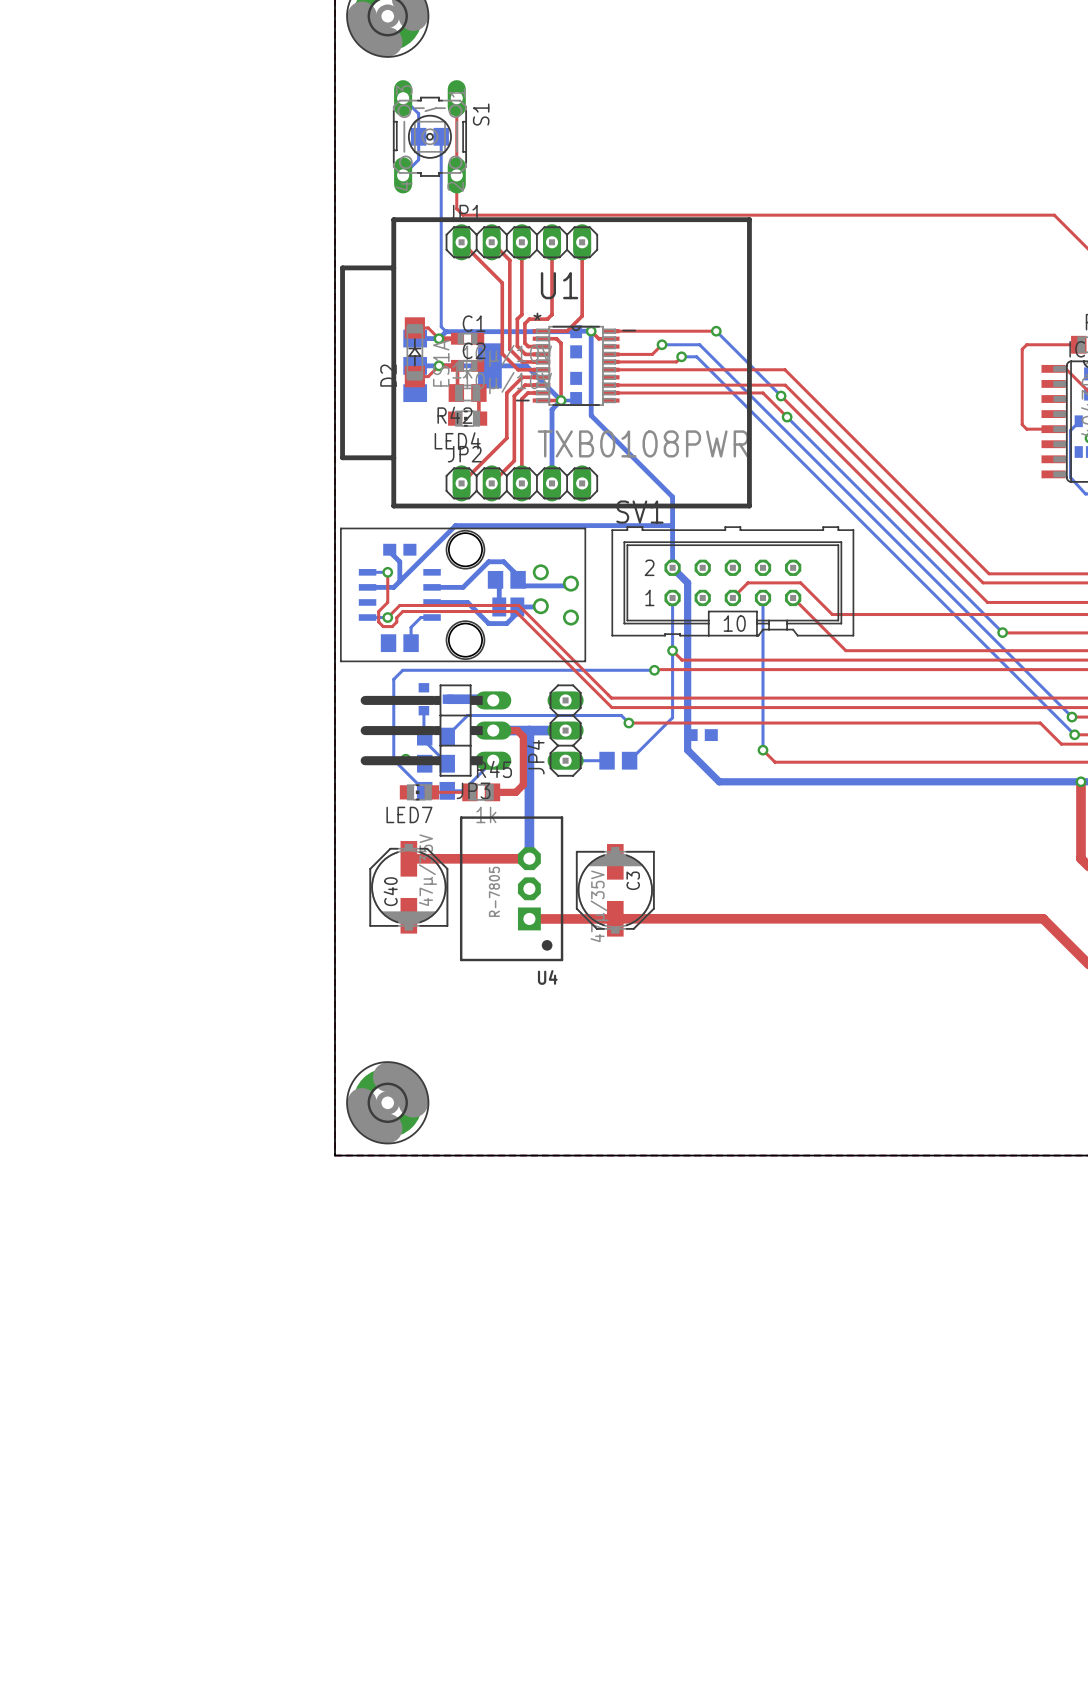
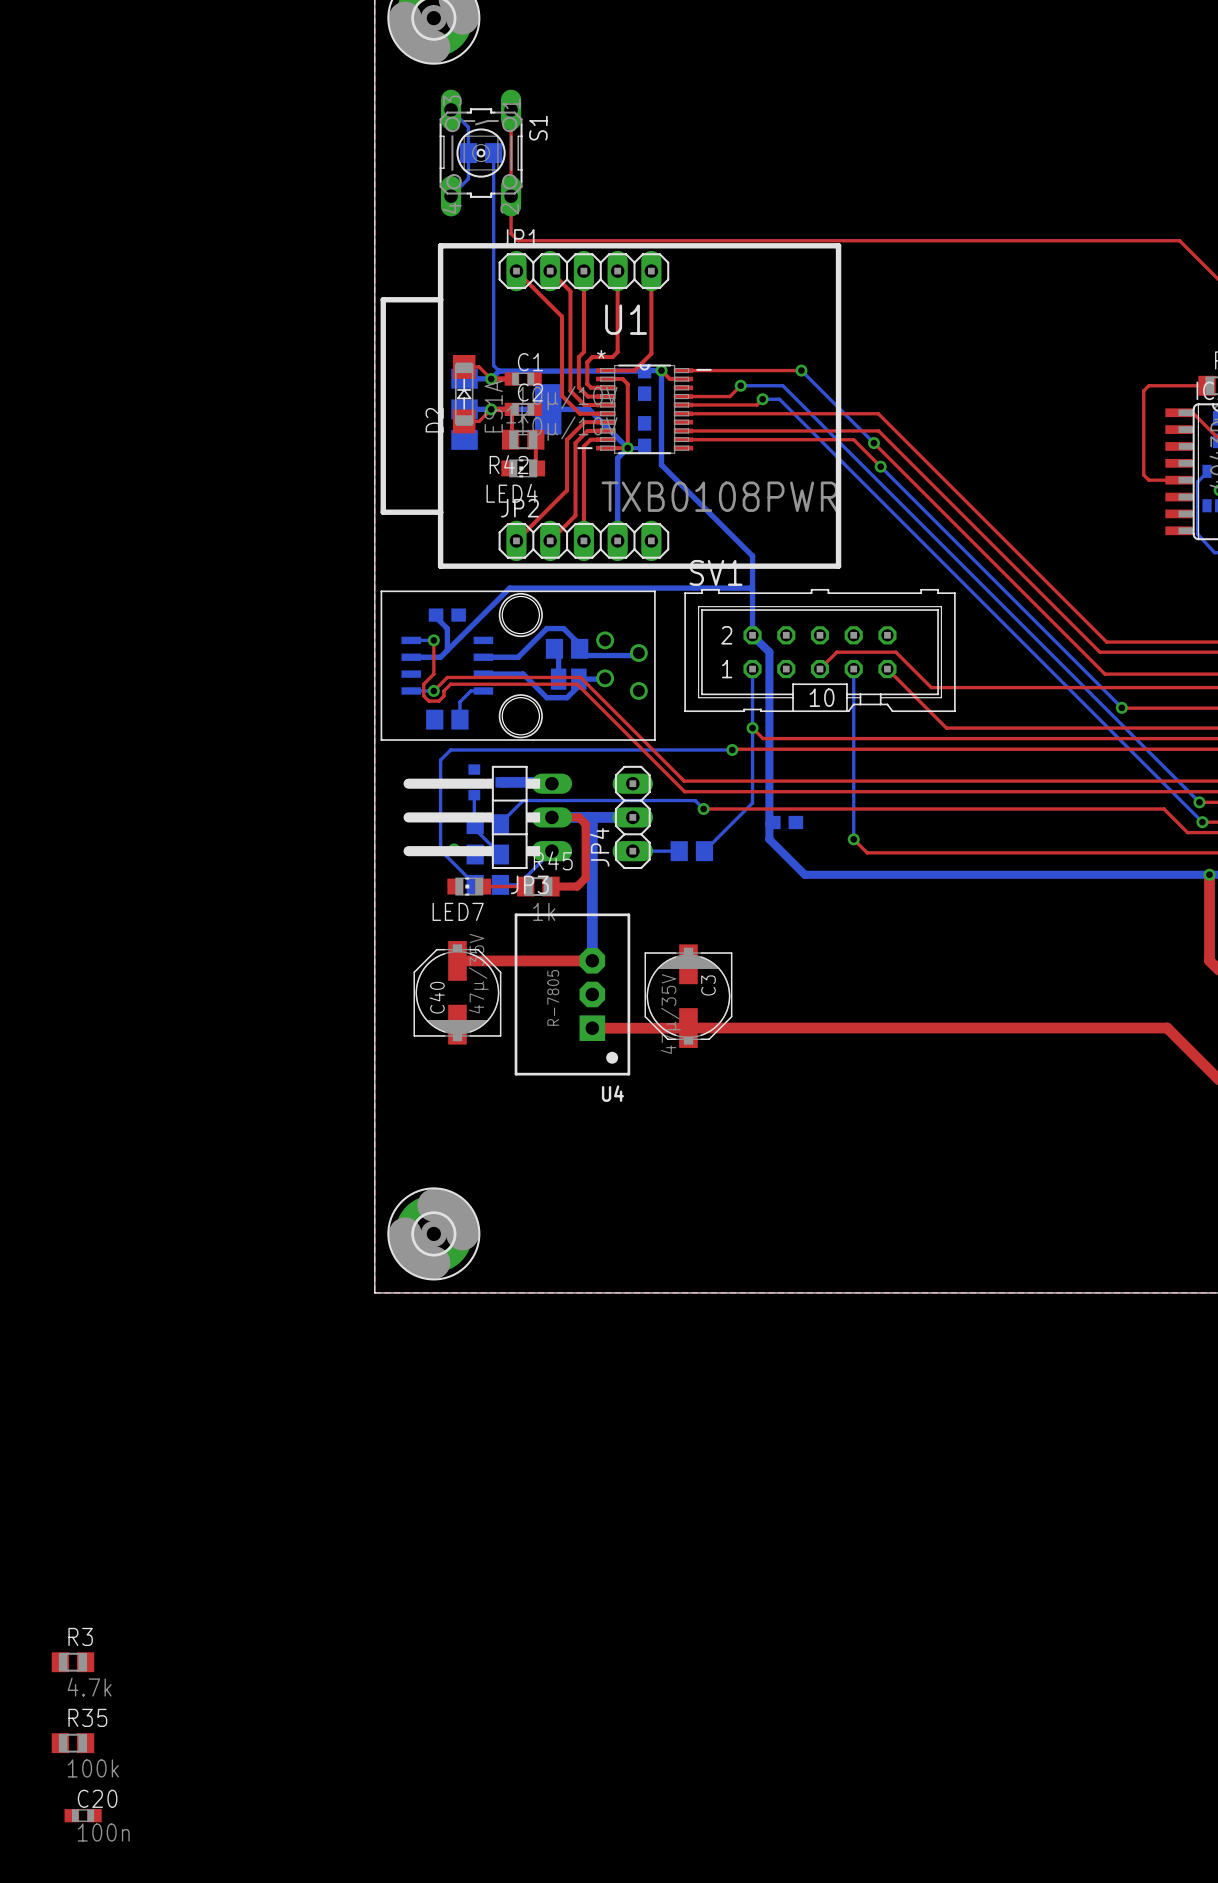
R3: none -> 4.7k (73, 1662)
R35: none -> 100k (73, 1743)
C20: none -> 100n (83, 1815)

